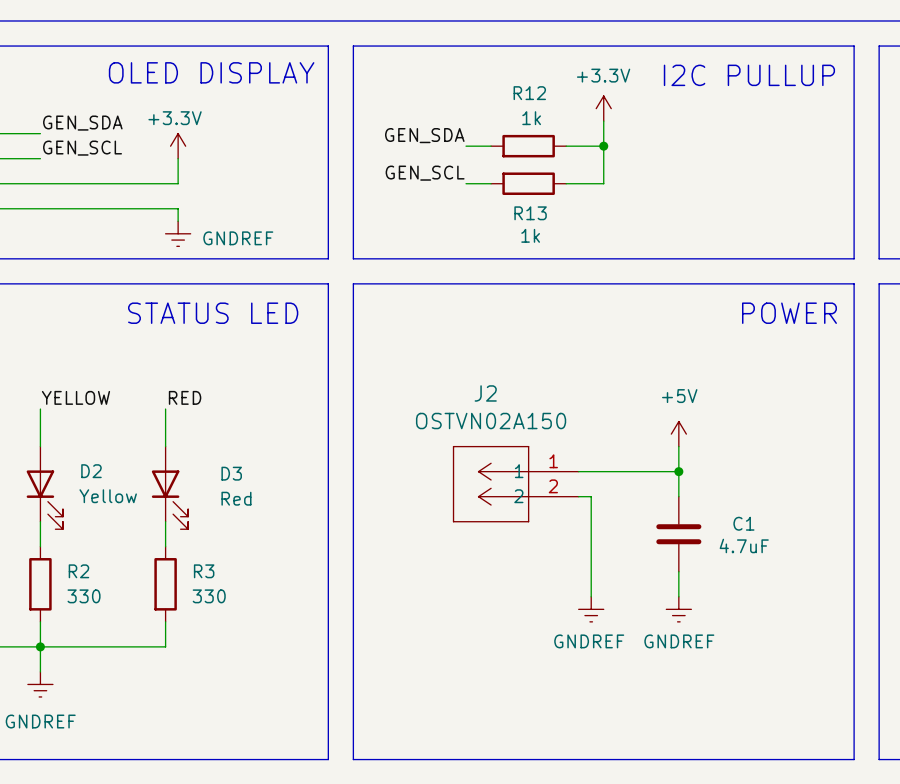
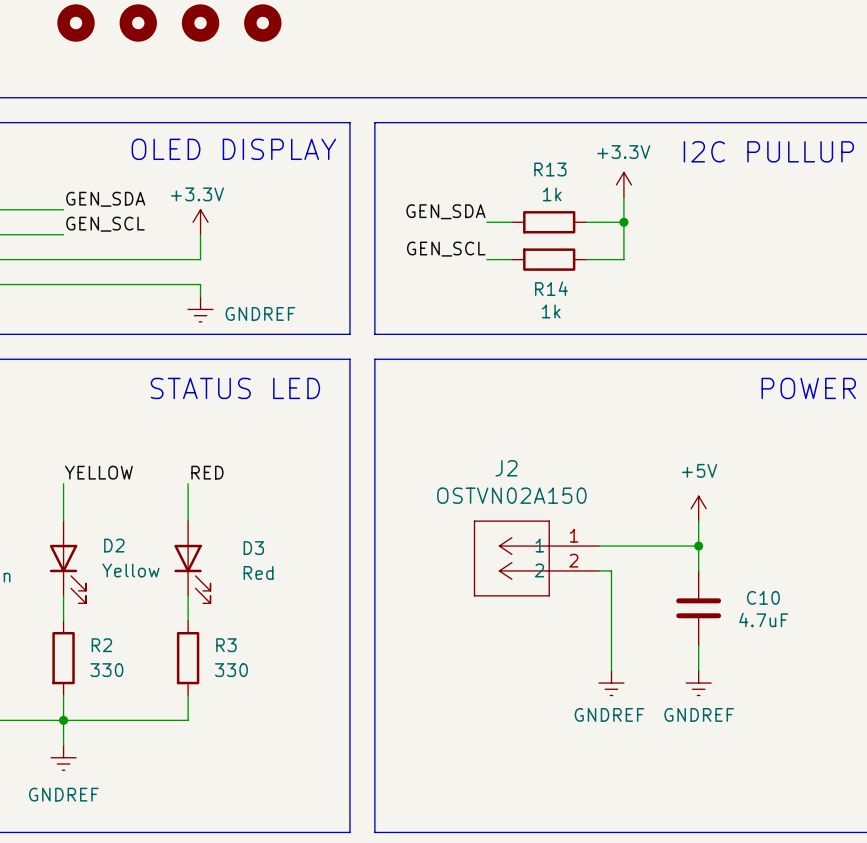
R12 name: R12 (529, 93) -> R13 (550, 169)
R13 name: R13 (530, 213) -> R14 (551, 288)
C1 name: C1 (743, 523) -> C10 (763, 597)

